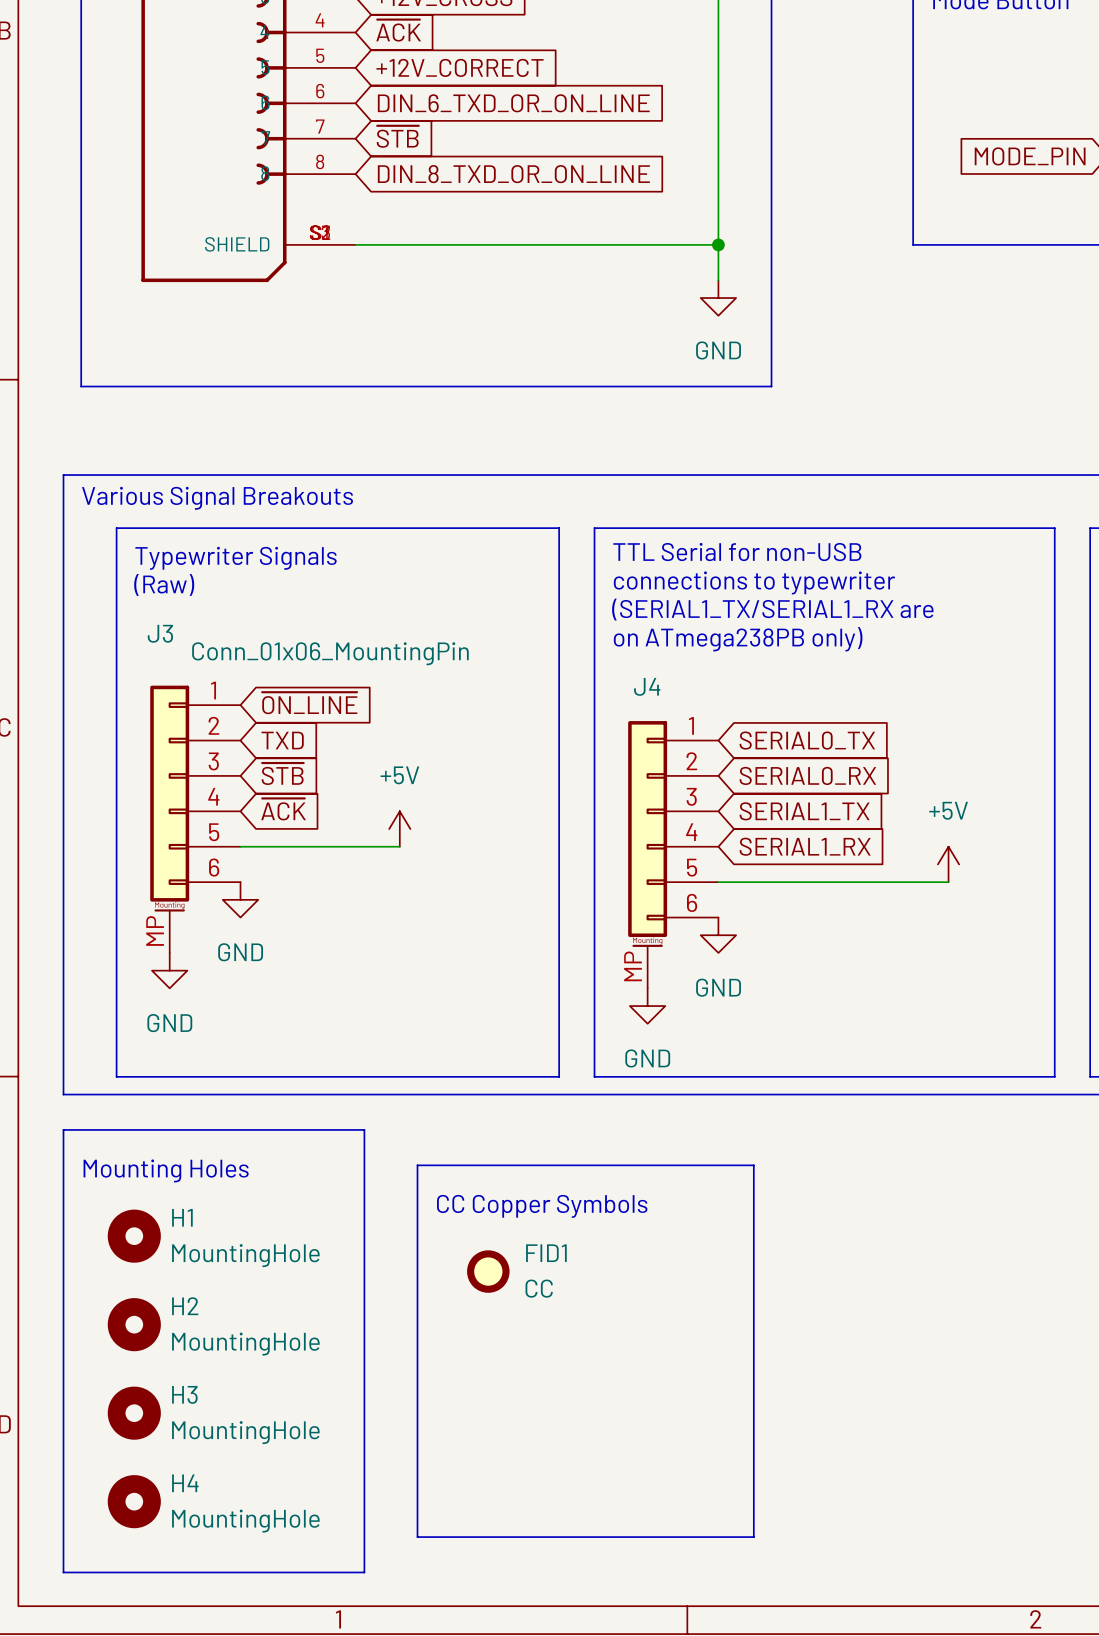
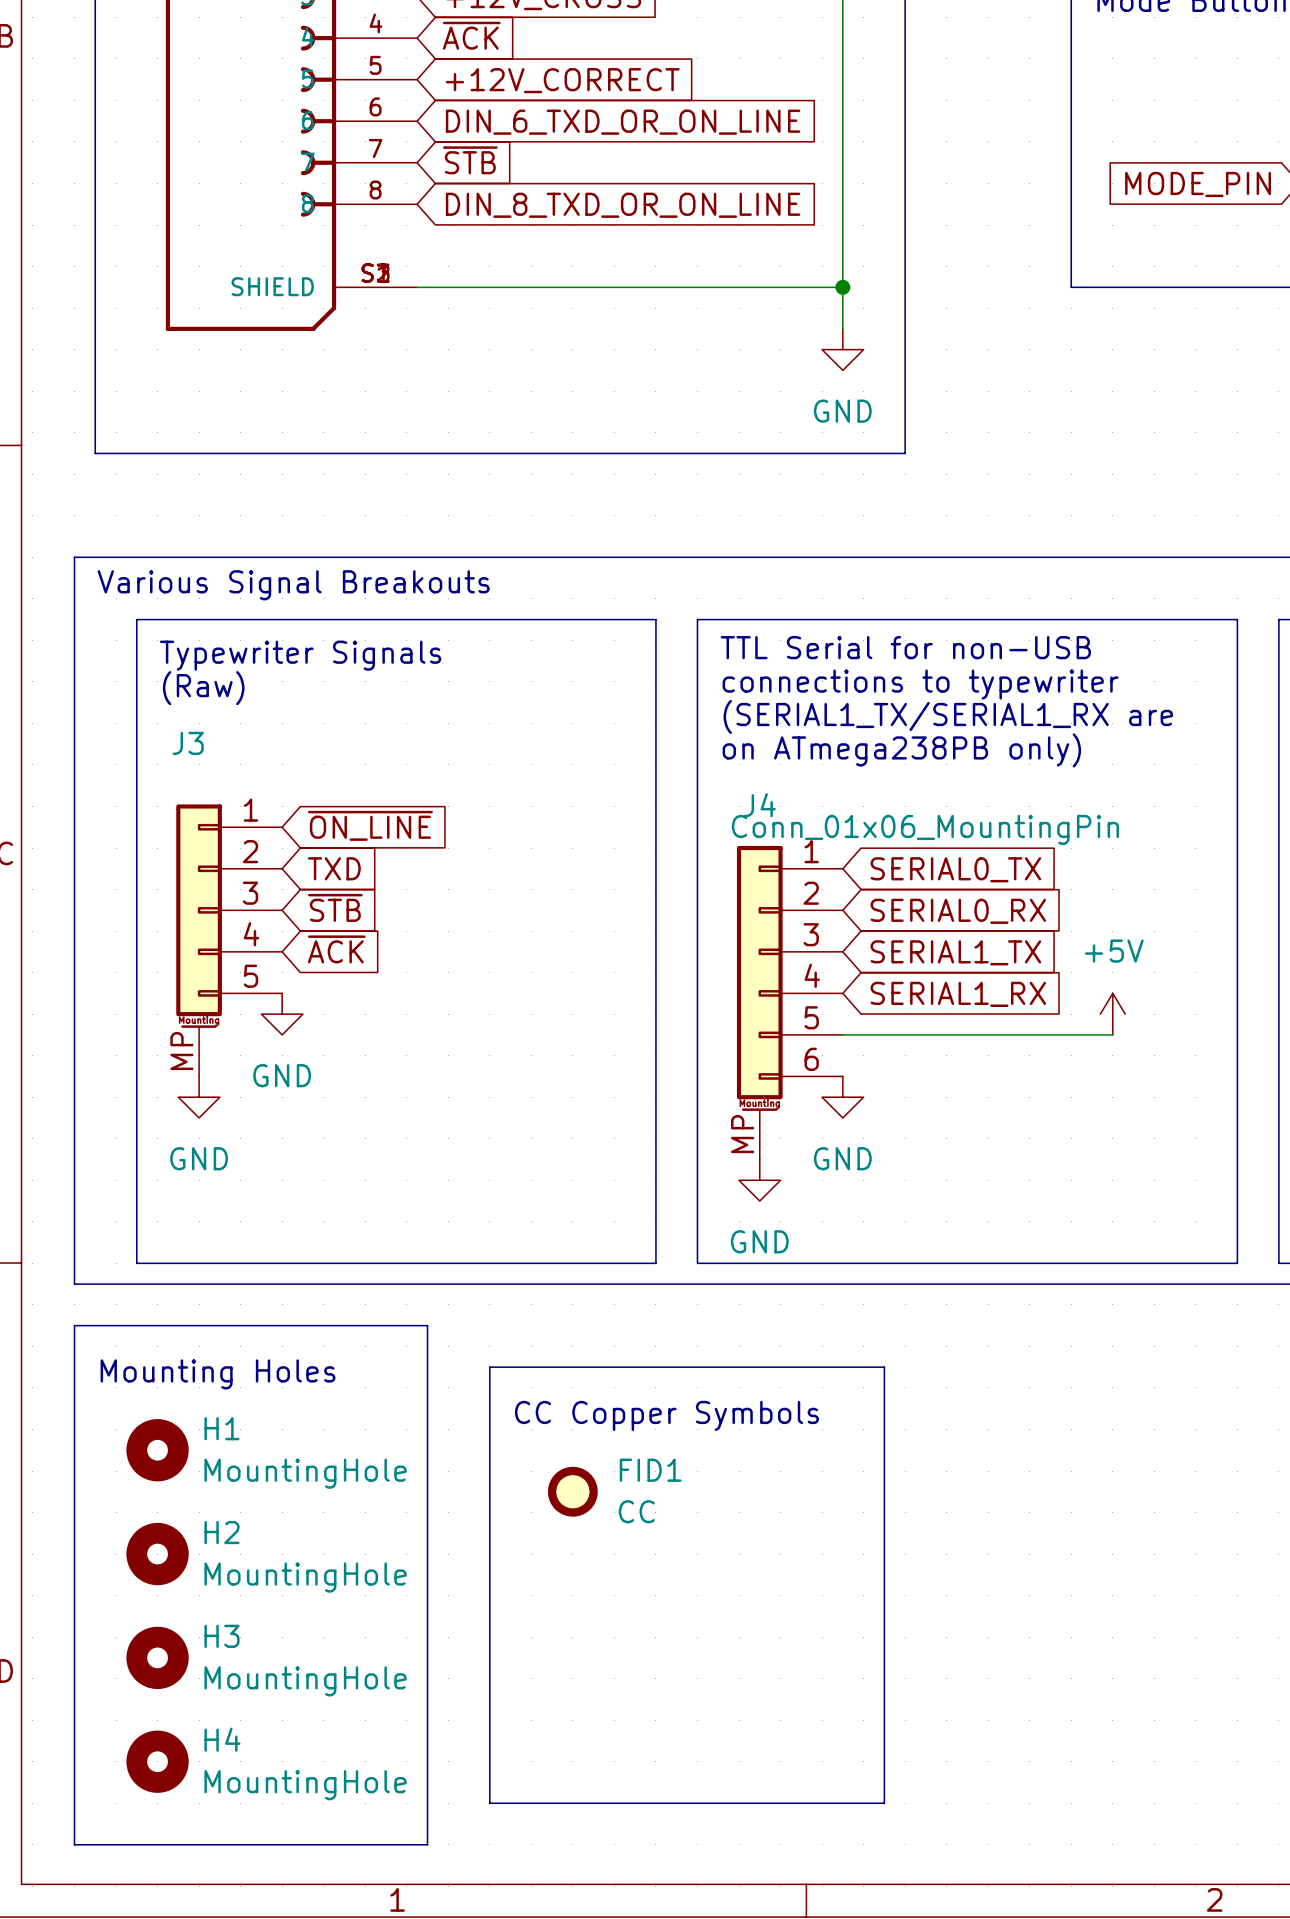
J3 value: Conn_01x06_MountingPin (330, 653) -> none
J3 symbol: [150, 685, 241, 953] -> [176, 804, 283, 1077]
J4 value: none -> Conn_01x06_MountingPin (925, 829)
power symbol: +5V (399, 829) -> none
wire: (240, 846) (399, 846) -> none
power symbol position: GND (240, 899) -> GND (282, 1014)
power symbol position: GND (169, 970) -> GND (199, 1097)

